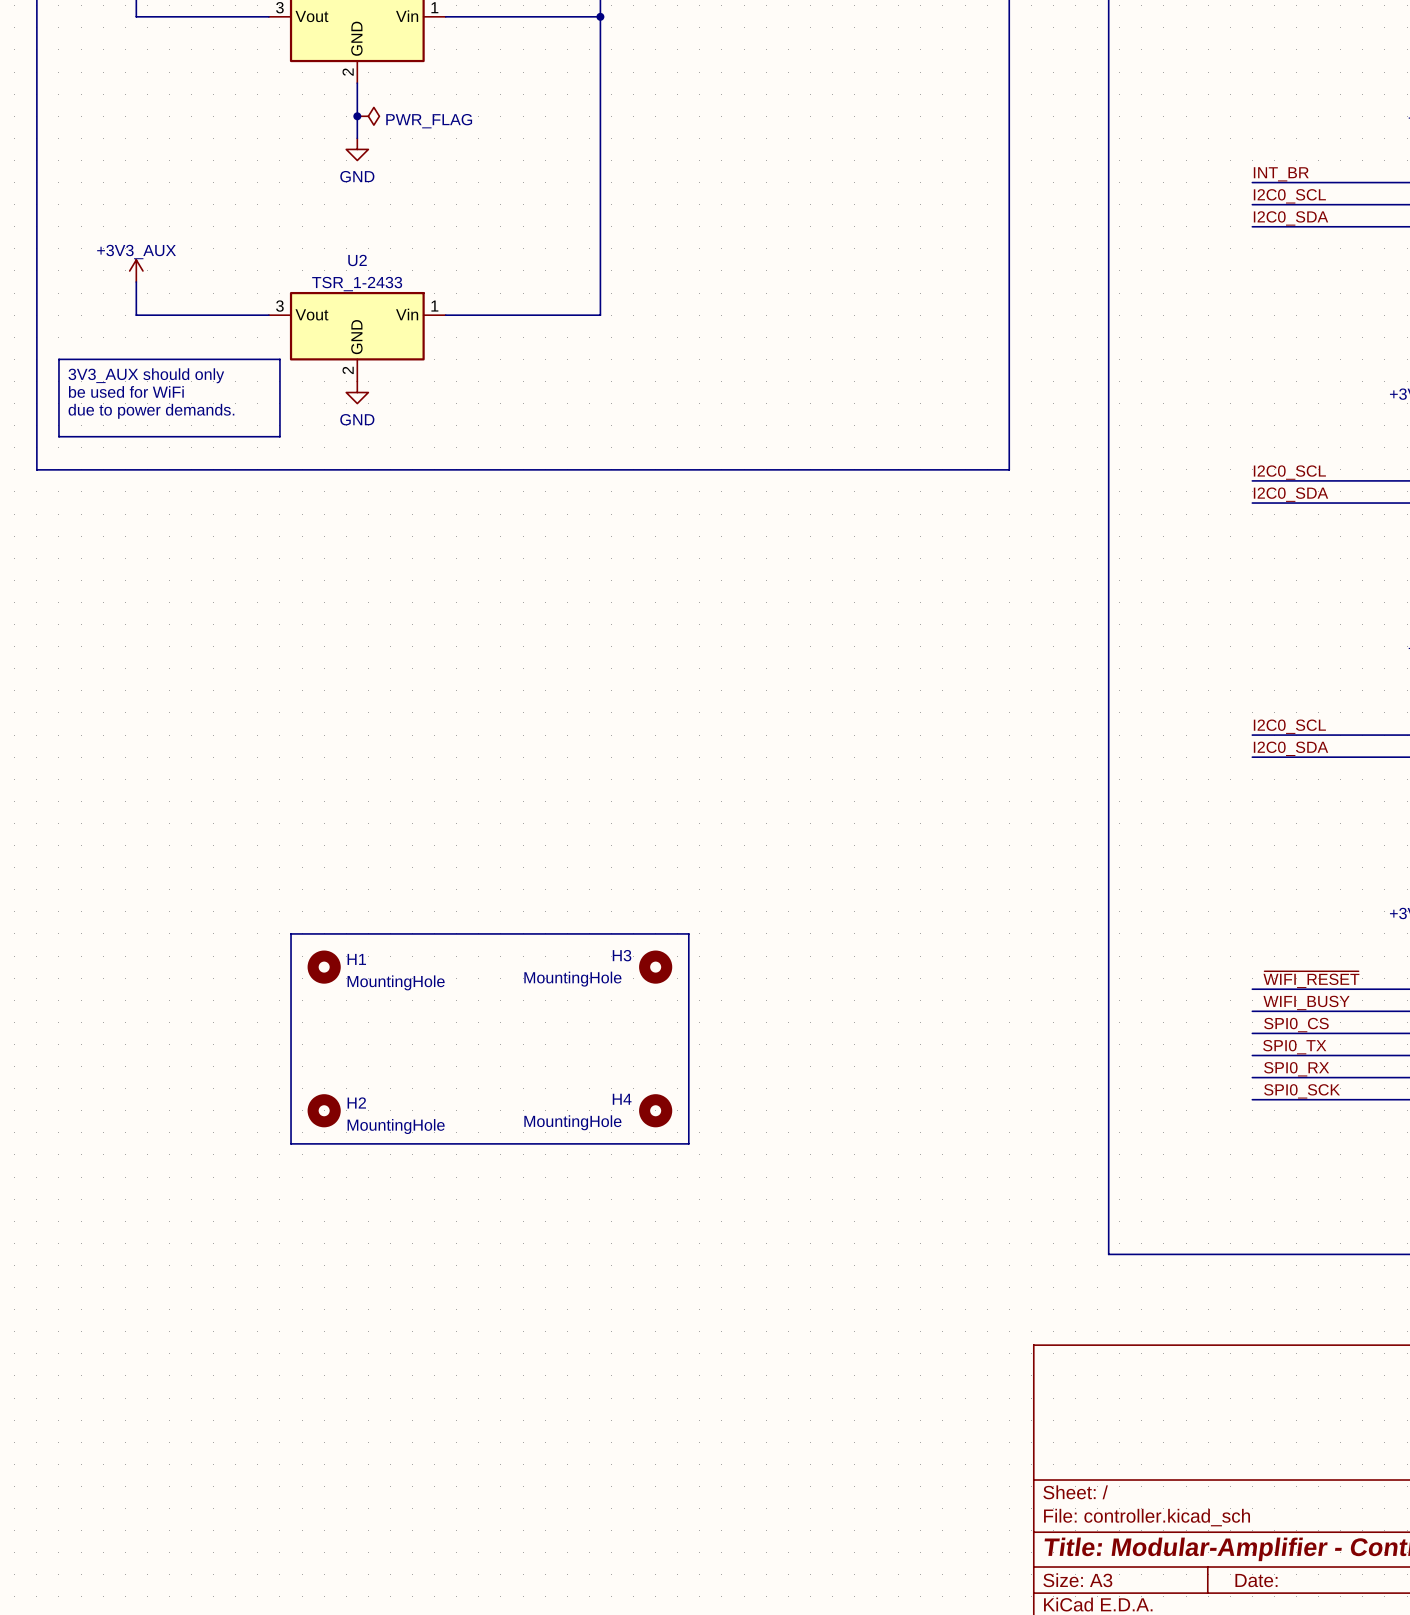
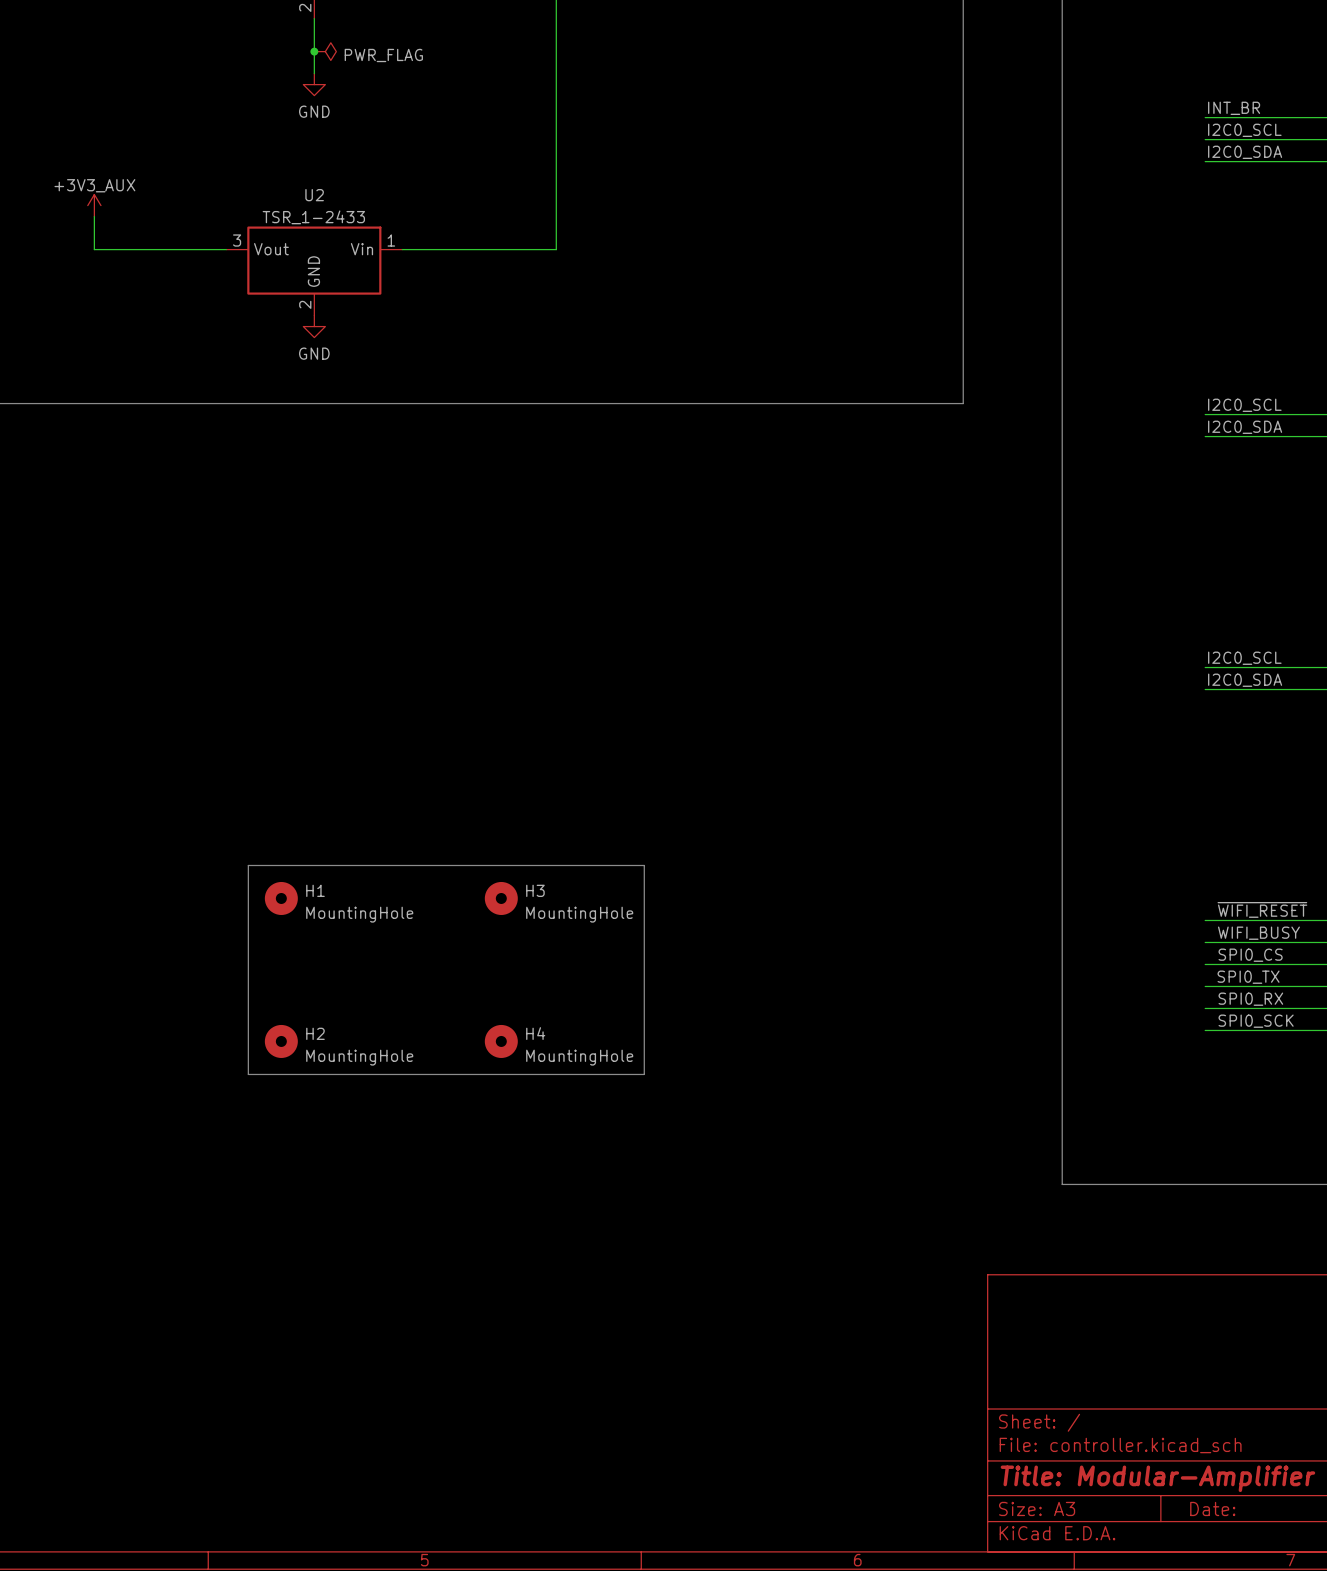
line: (58, 359) (279, 359) (279, 436) (58, 436) (58, 359) -> none
text: 3V3_AUX should only (146, 375) -> none
text: be used for WiFi (126, 391) -> none
text: due to power demands. (151, 411) -> none
H3 name position: H3 (622, 955) -> H3 (535, 890)
H3 position: (655, 967) -> (501, 898)
H3 value position: MountingHole (572, 979) -> MountingHole (579, 914)
H4 name position: H4 (622, 1099) -> H4 (535, 1033)
H4 position: (655, 1110) -> (501, 1041)
H4 value position: MountingHole (572, 1122) -> MountingHole (579, 1057)

